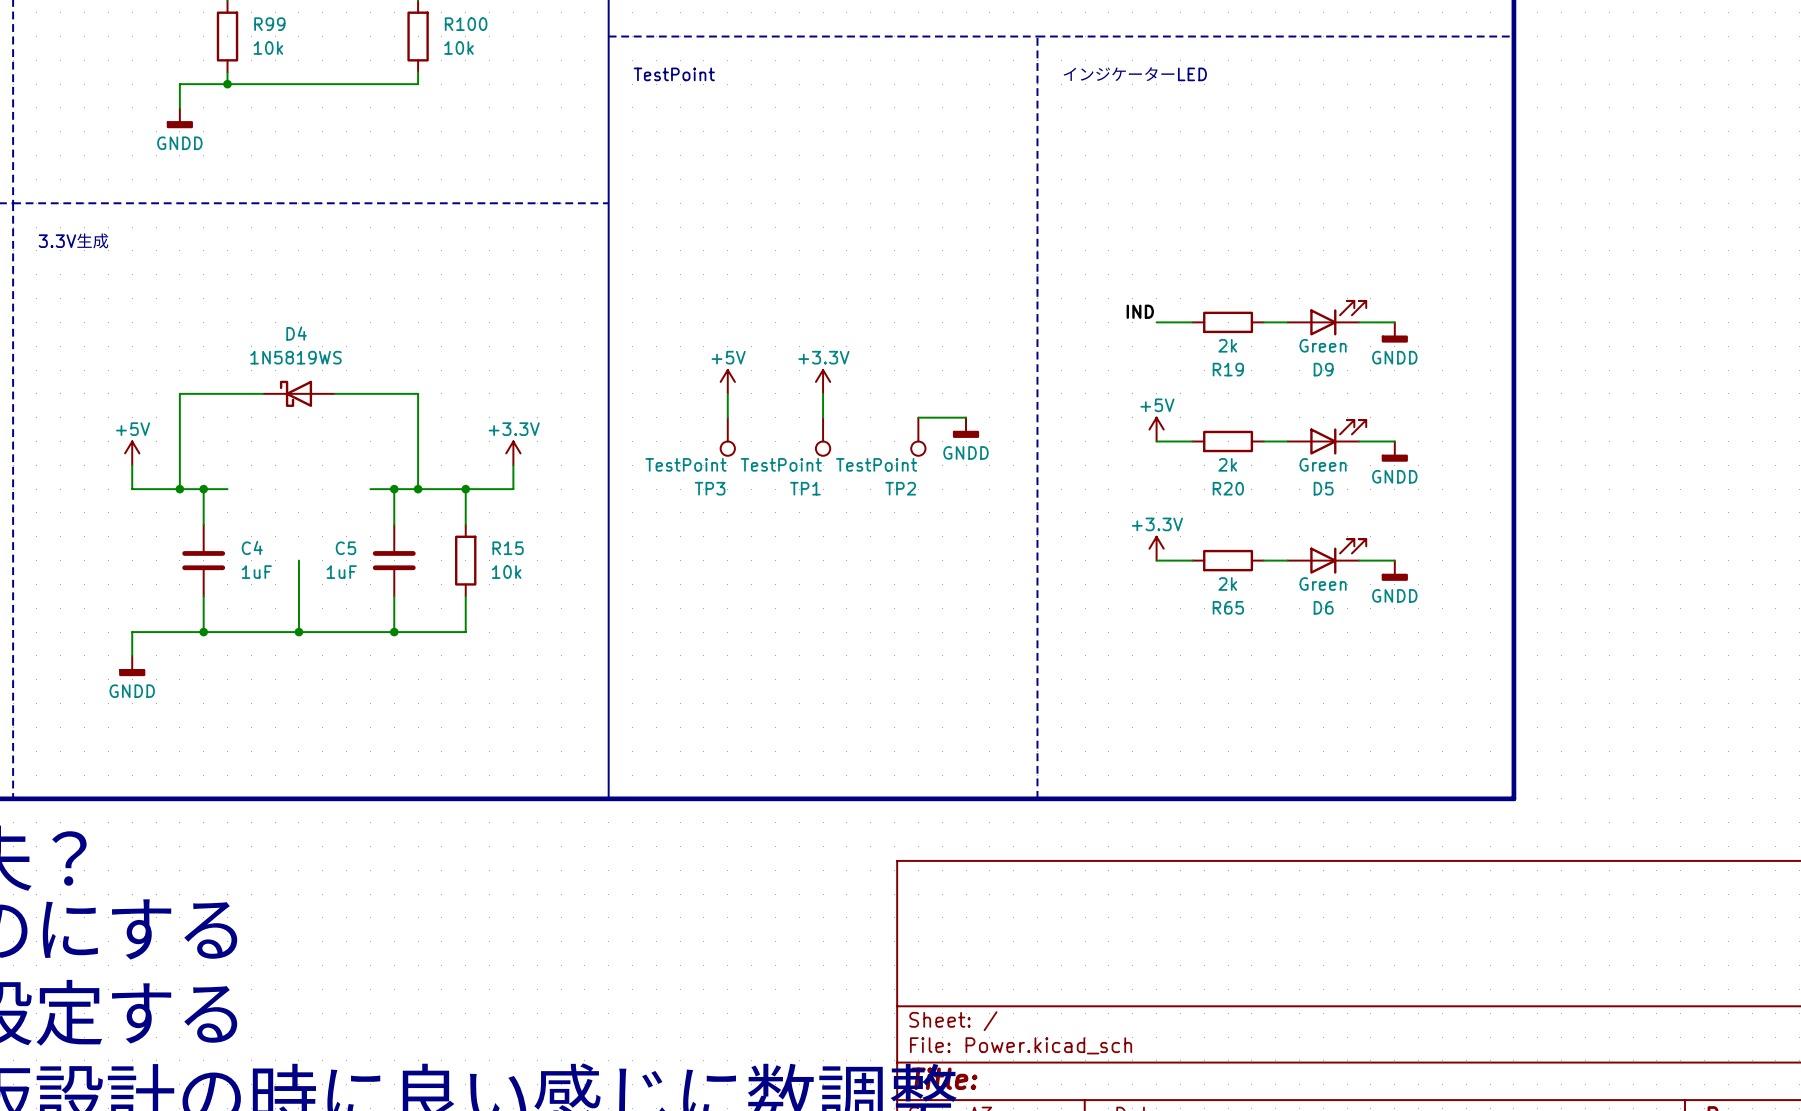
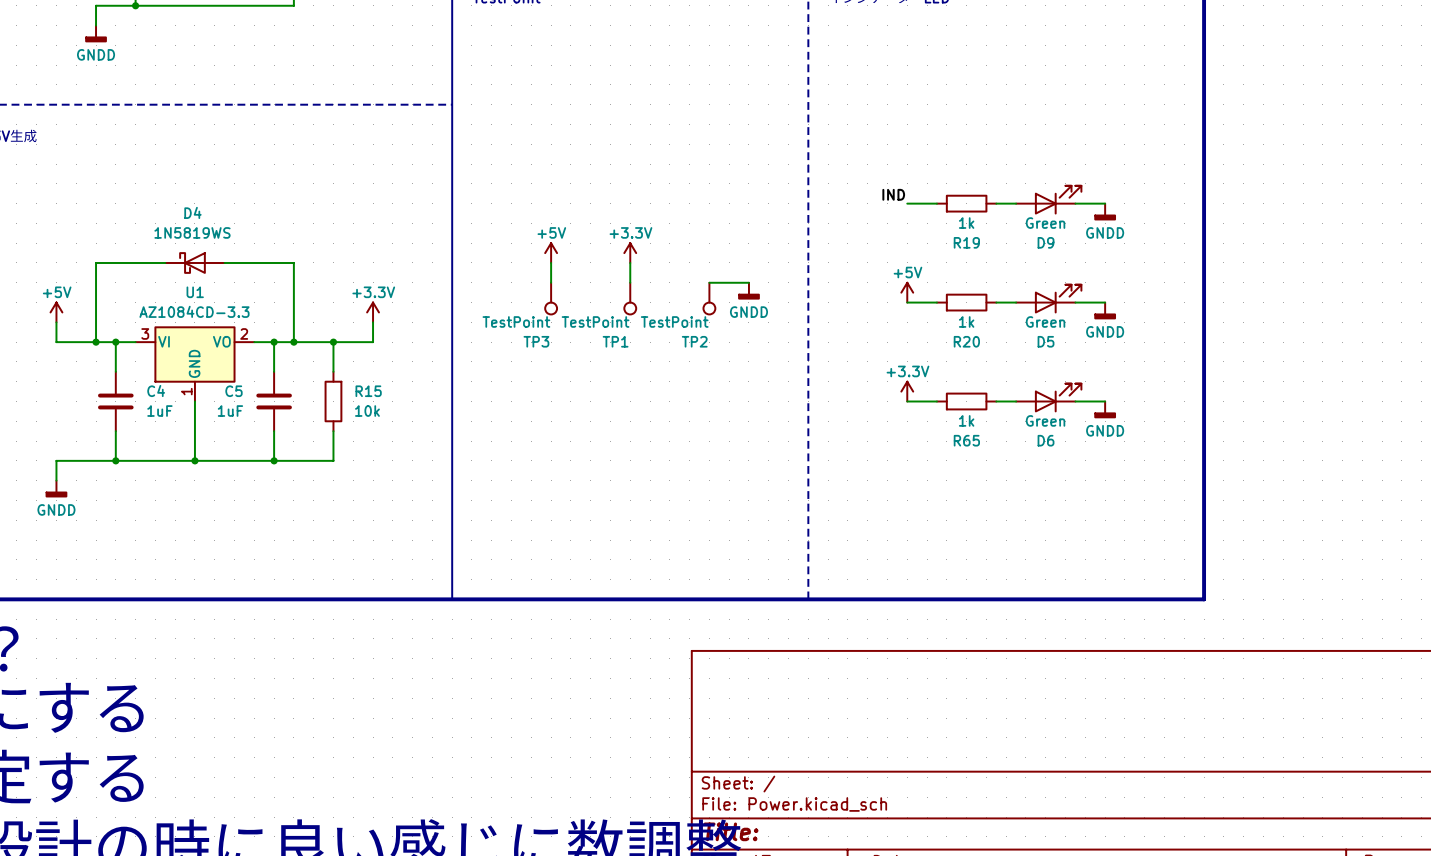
R19 value: 2k (1227, 345) -> 1k (966, 223)
R20 value: 2k (1227, 464) -> 1k (966, 321)
U1: none -> AZ1084CD-3.3 (194, 363)
R65 value: 2k (1227, 583) -> 1k (966, 420)

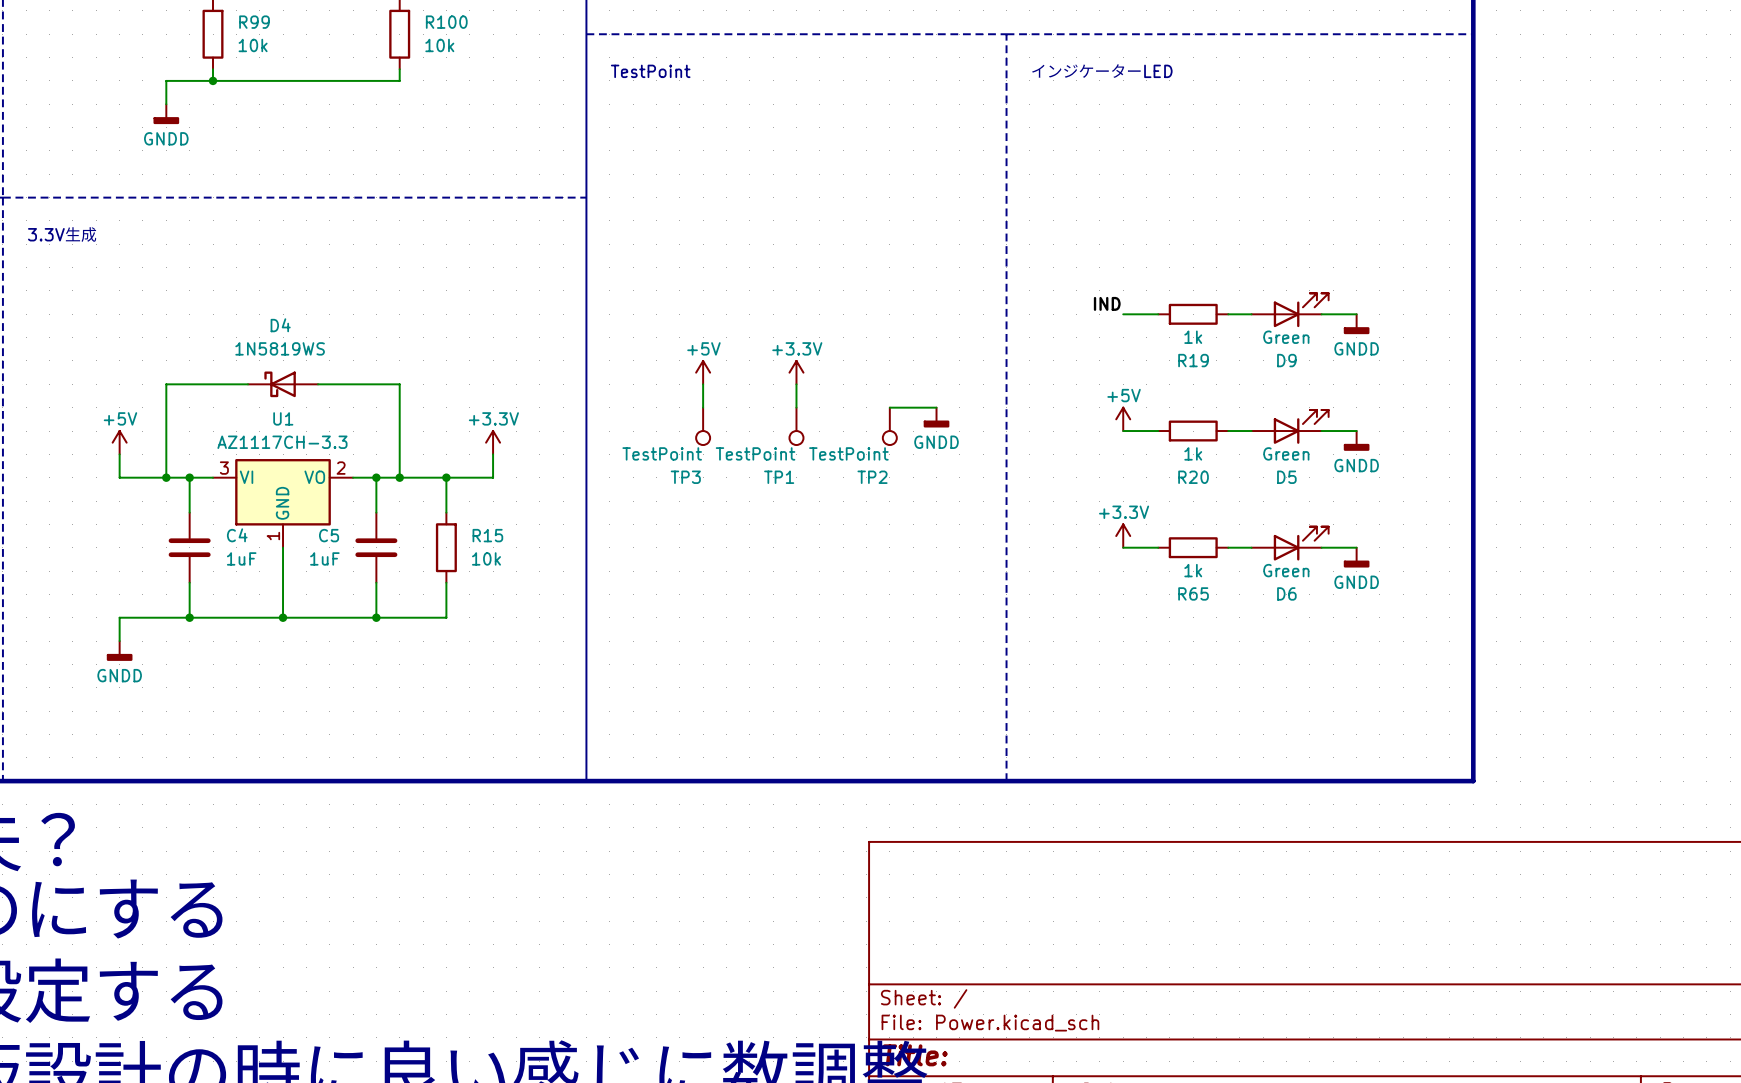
U1 value: AZ1084CD-3.3 (194, 311) -> AZ1117CH-3.3 (282, 442)

